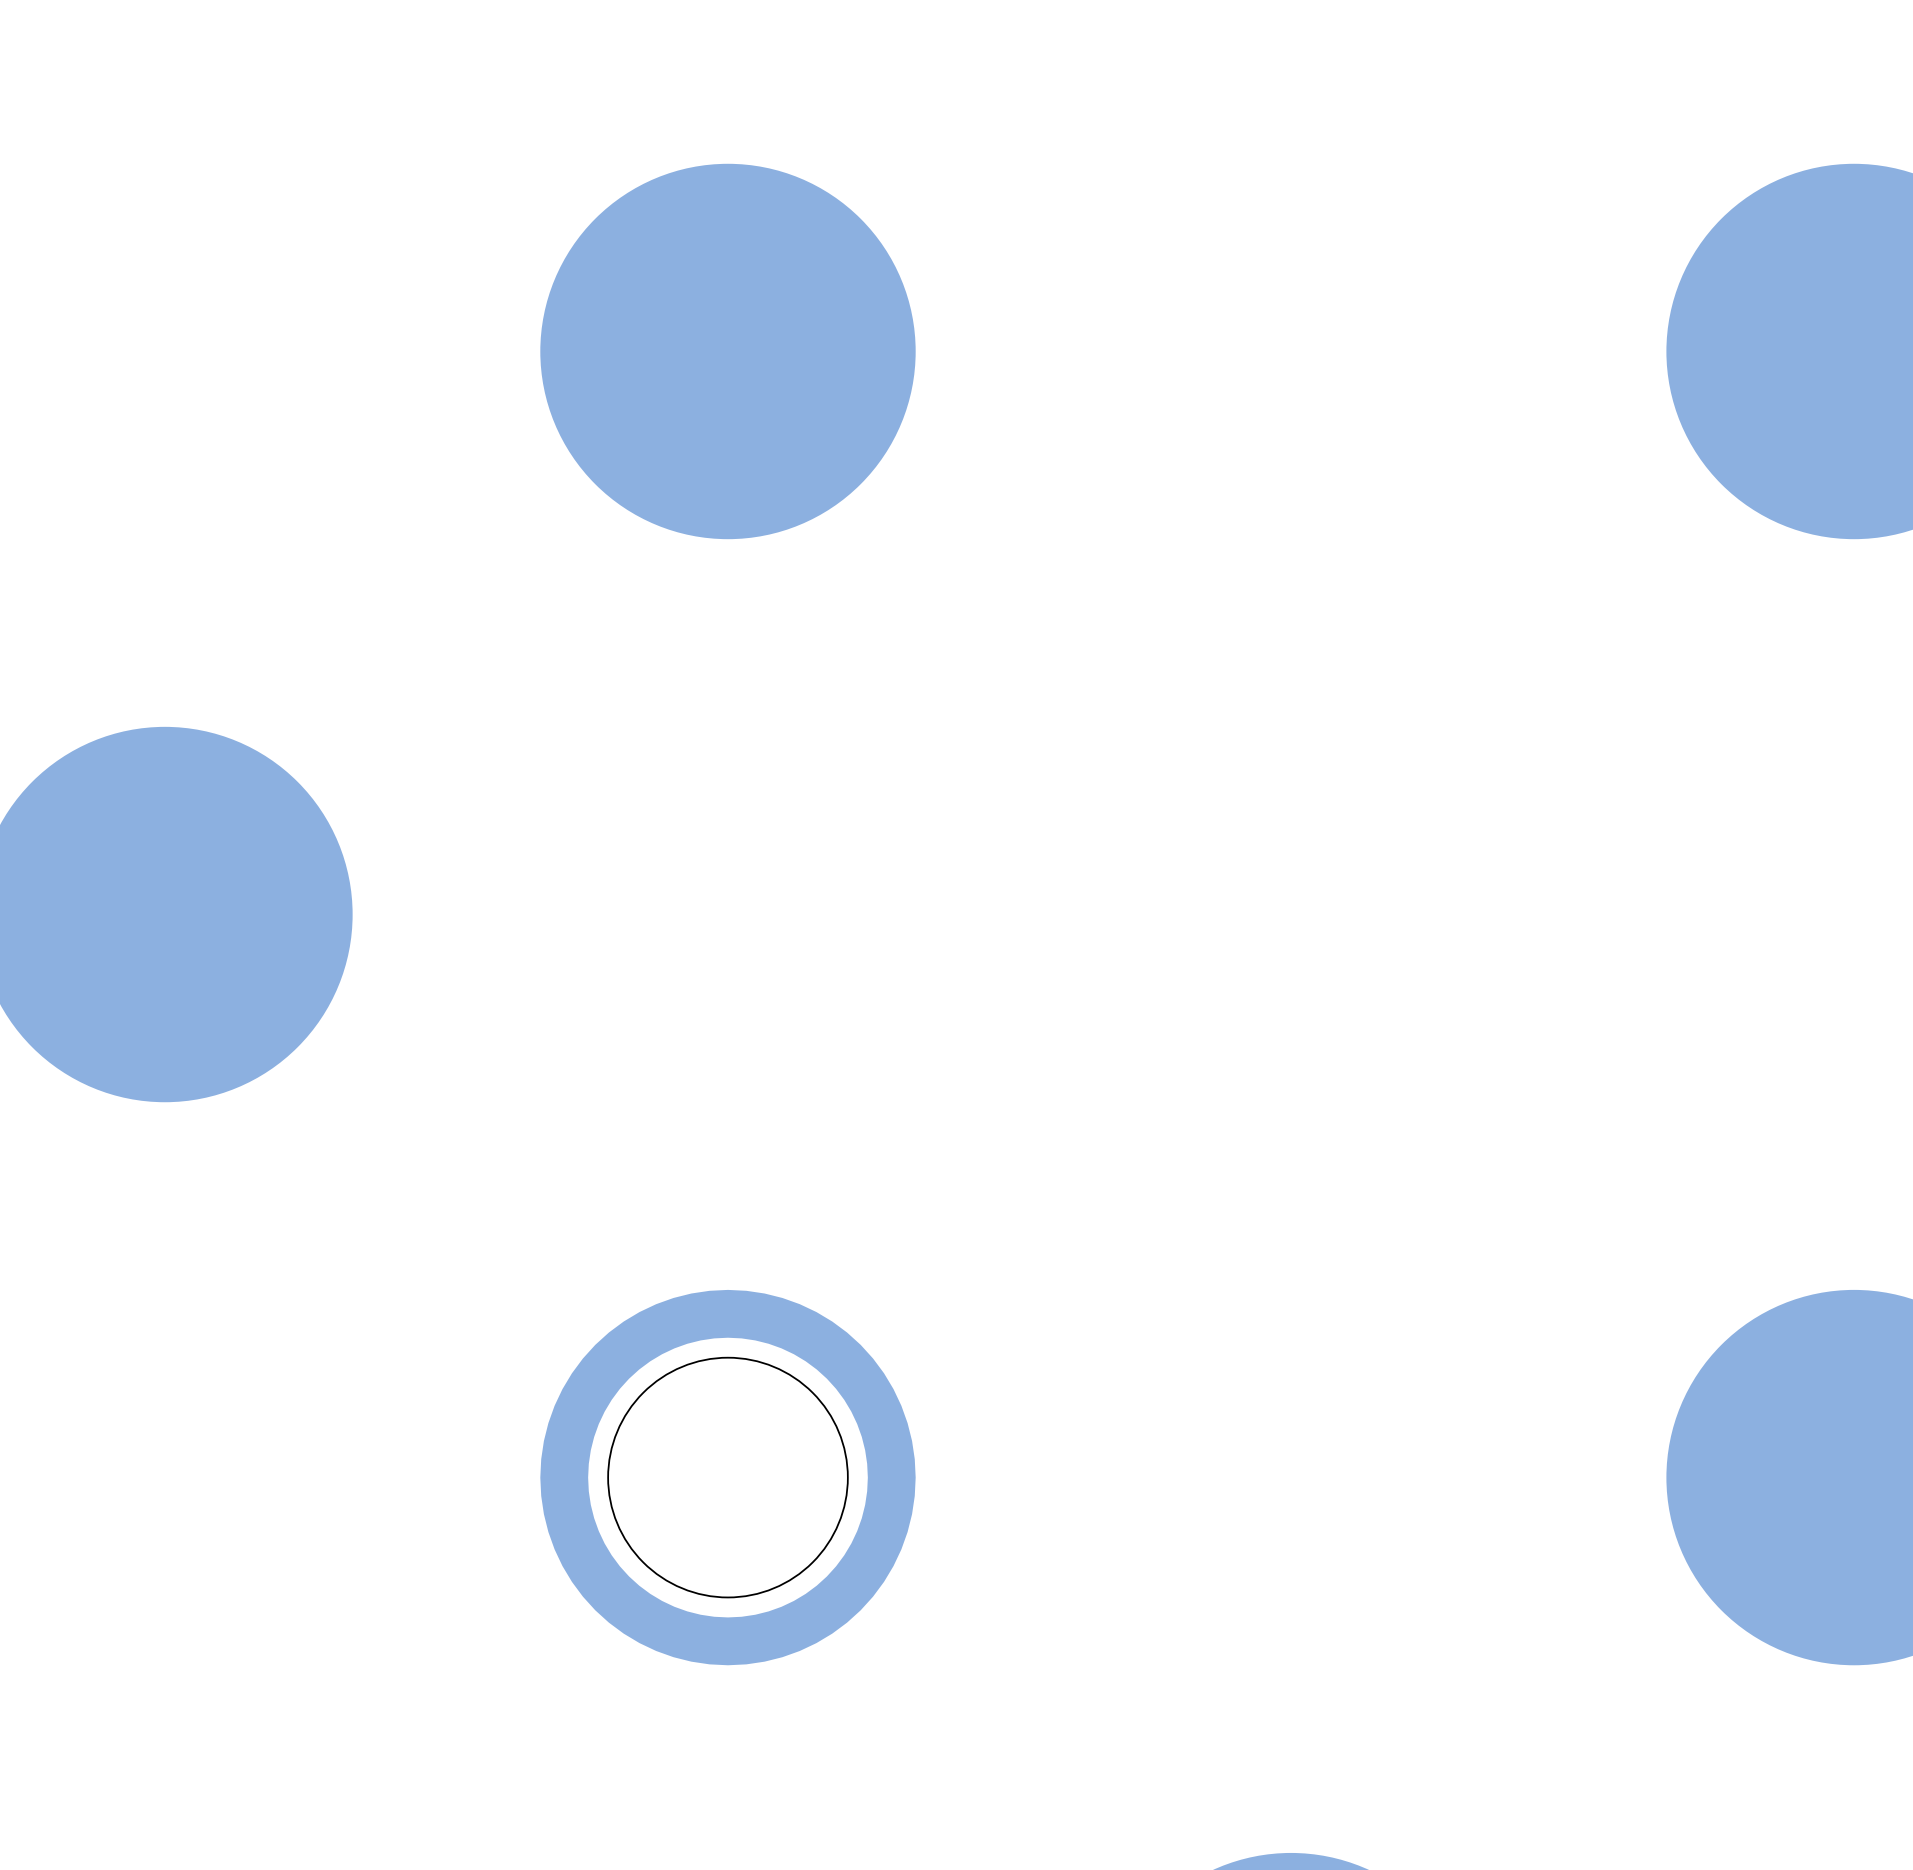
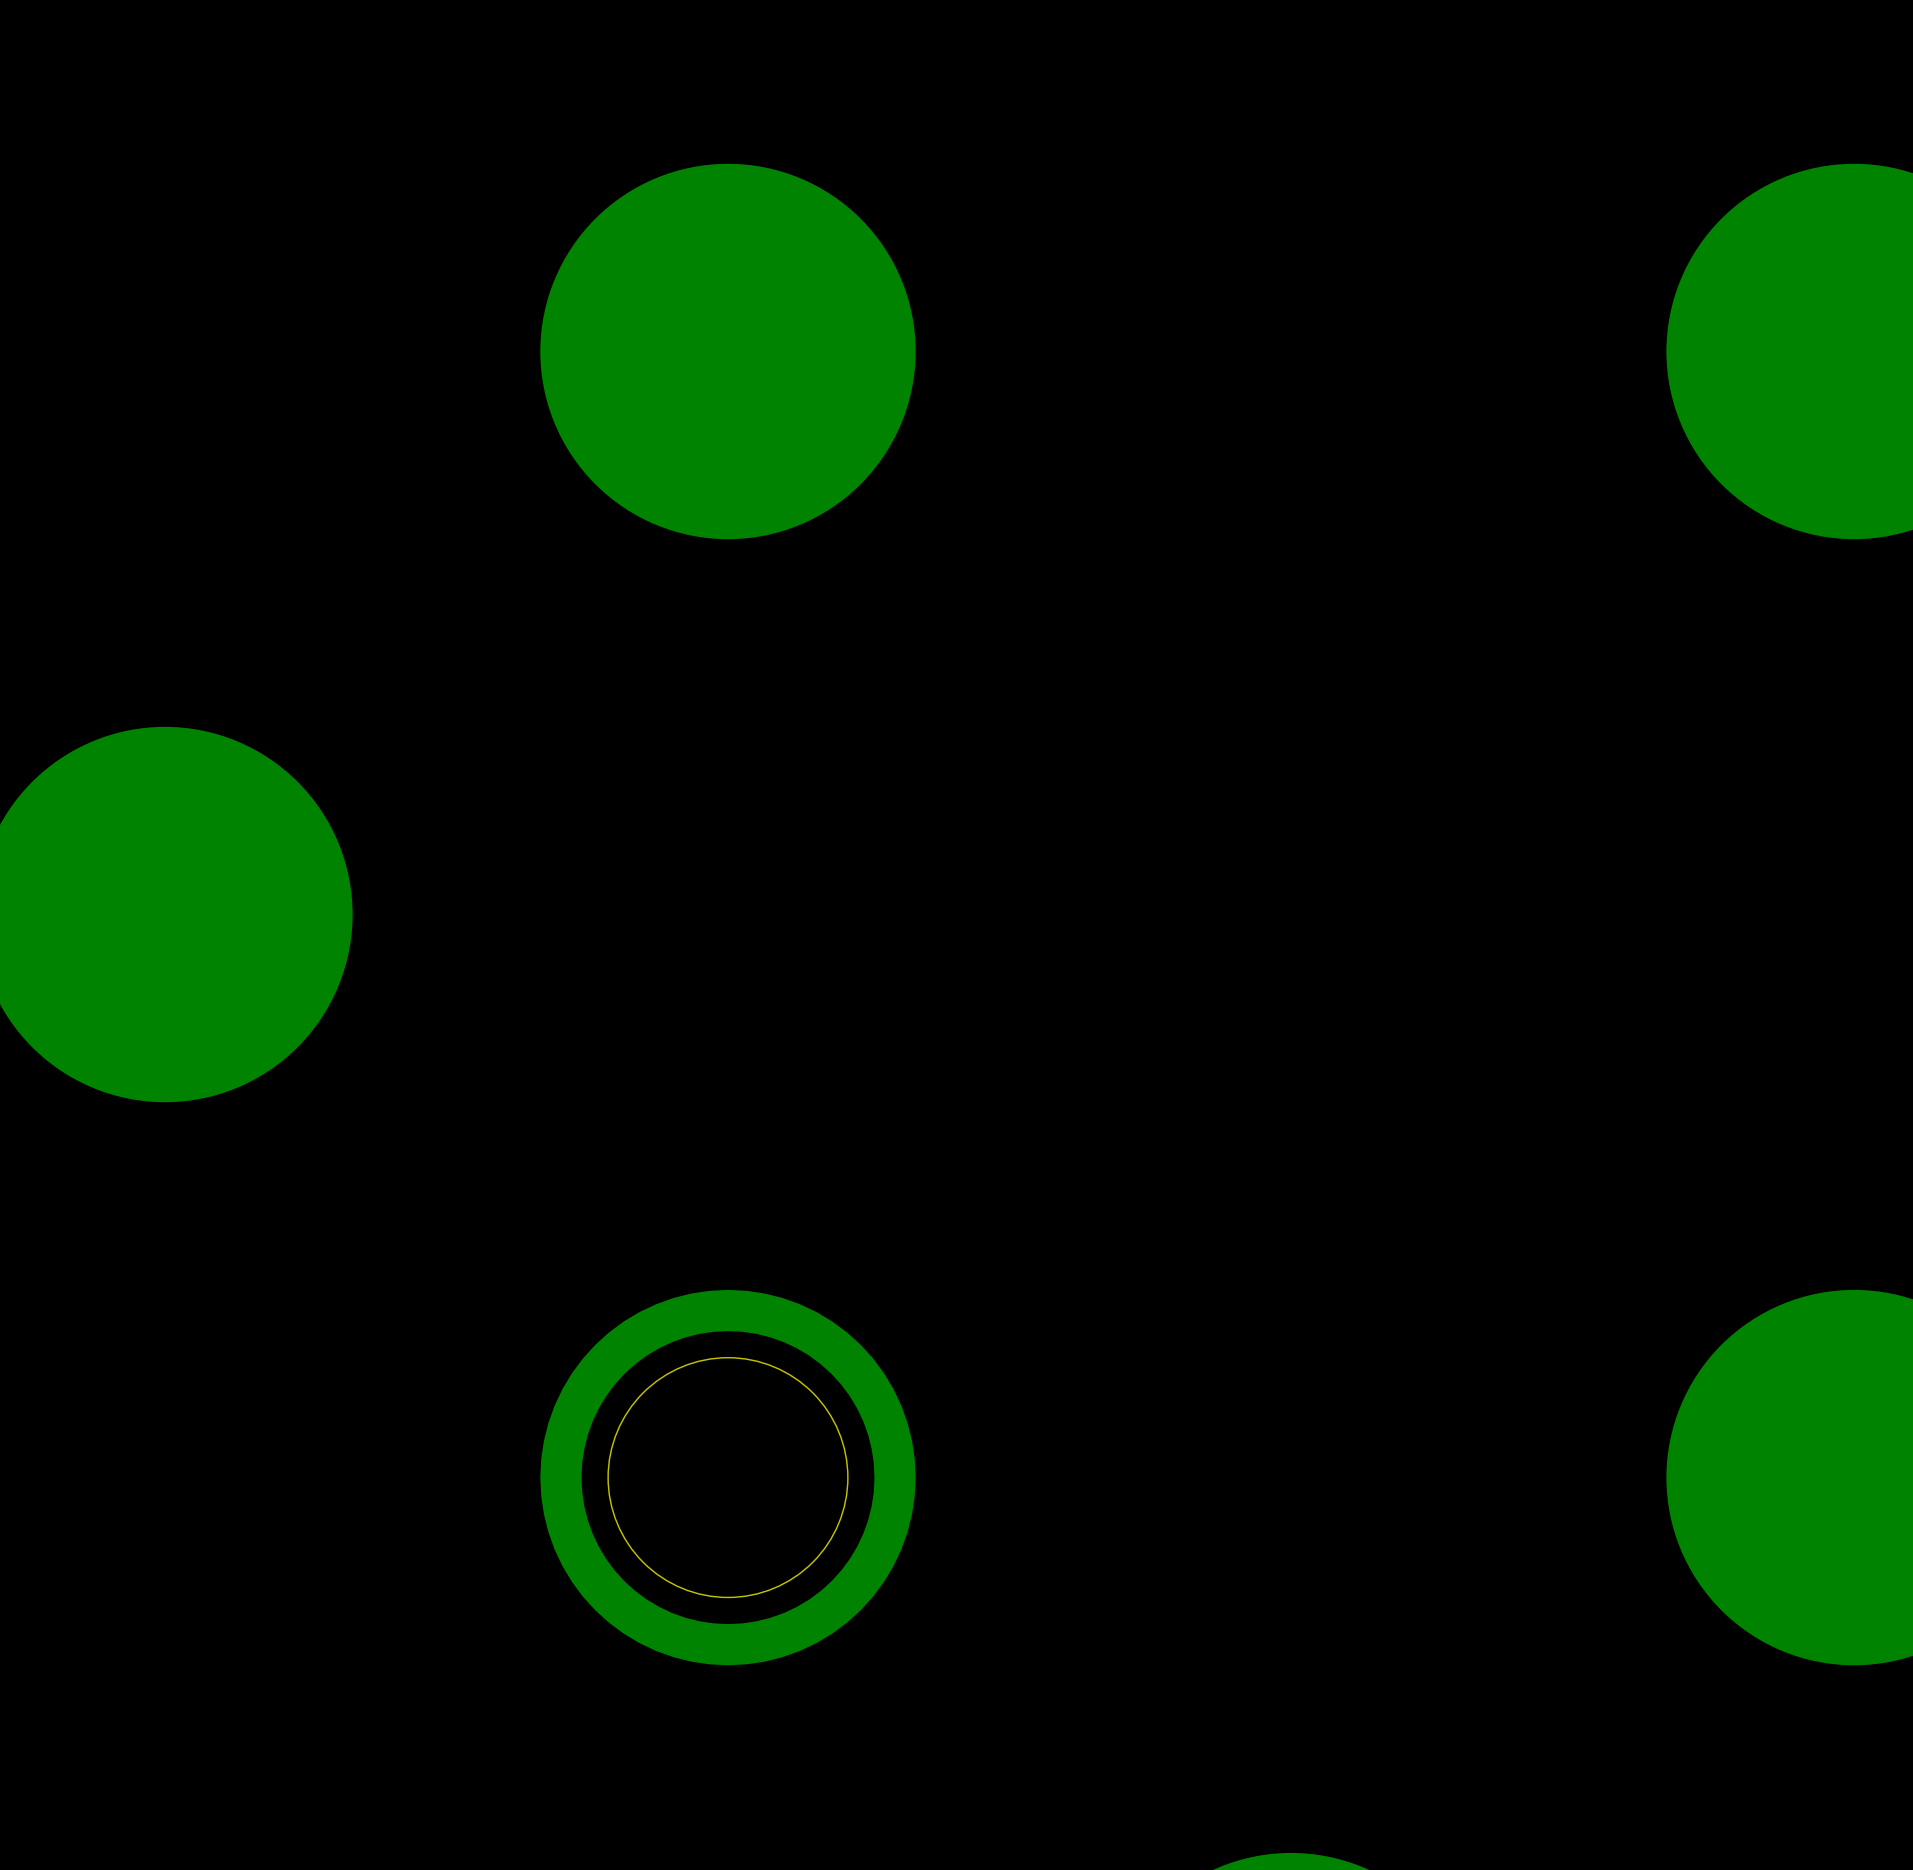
drawing shape: [540, 1289, 916, 1666] -> [540, 1289, 916, 1666]

